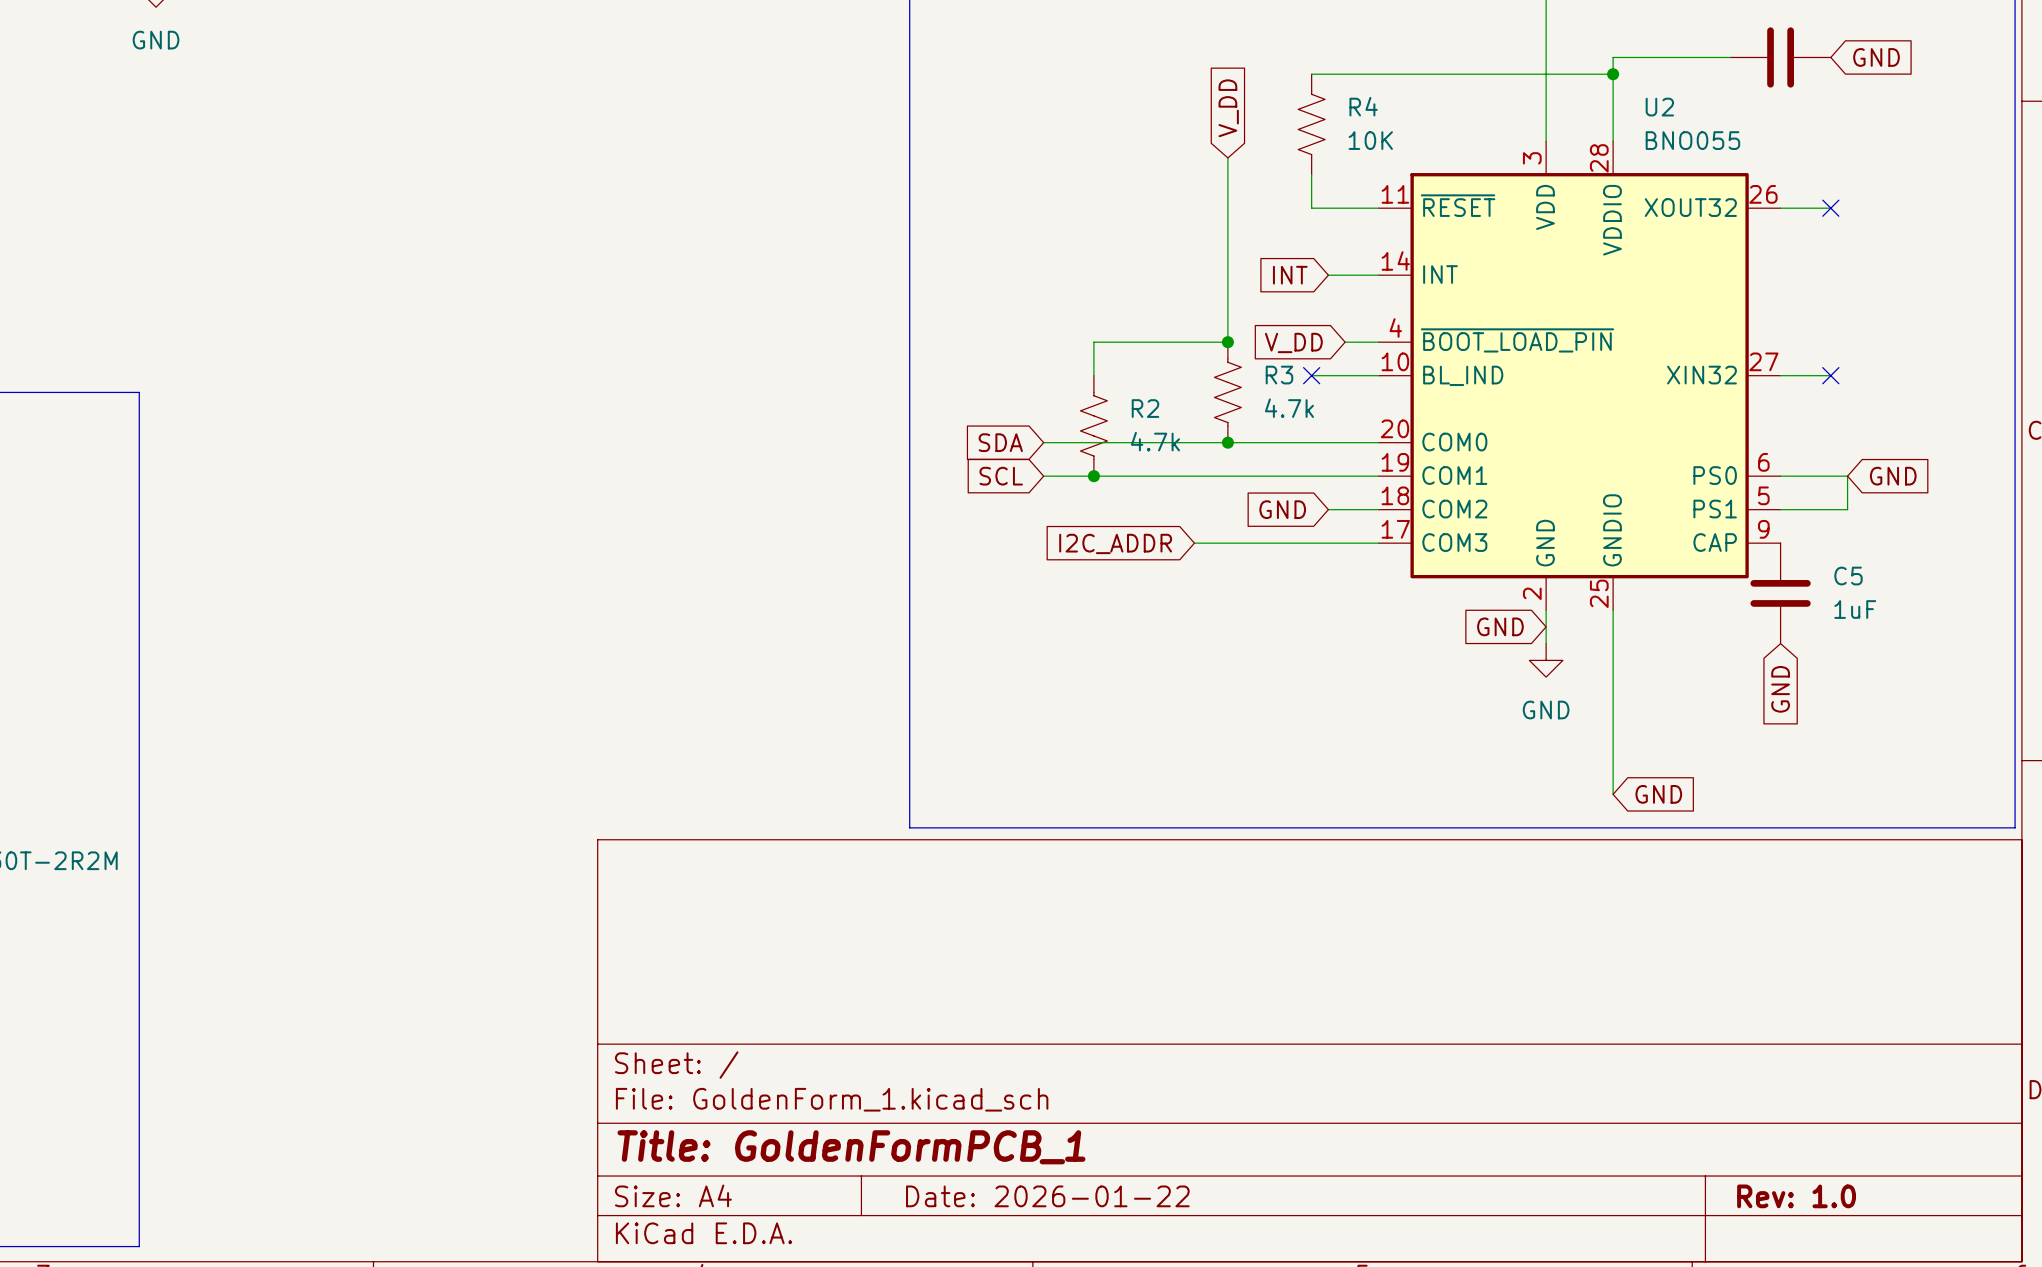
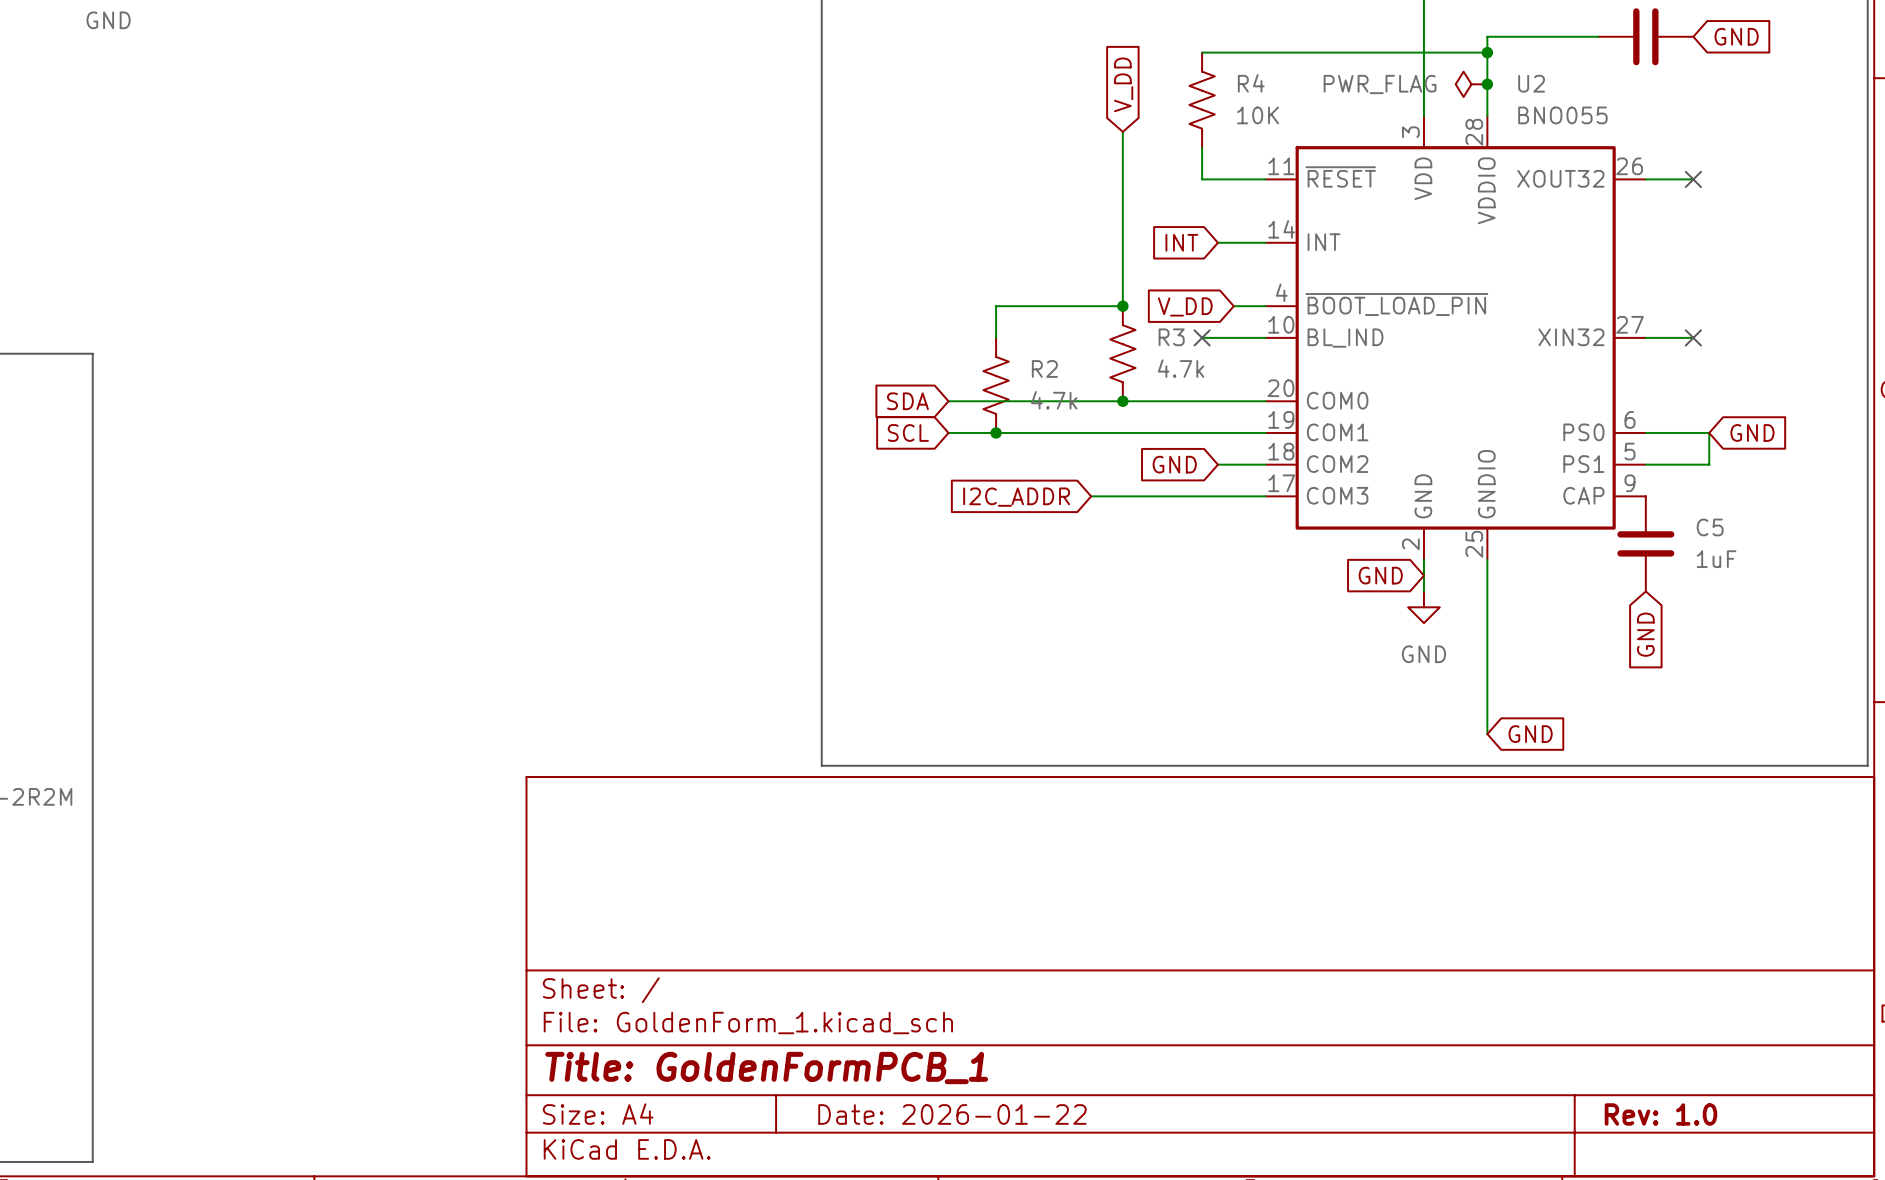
power symbol: none -> PWR_FLAG (1471, 84)
junction: none -> (1487, 84)

